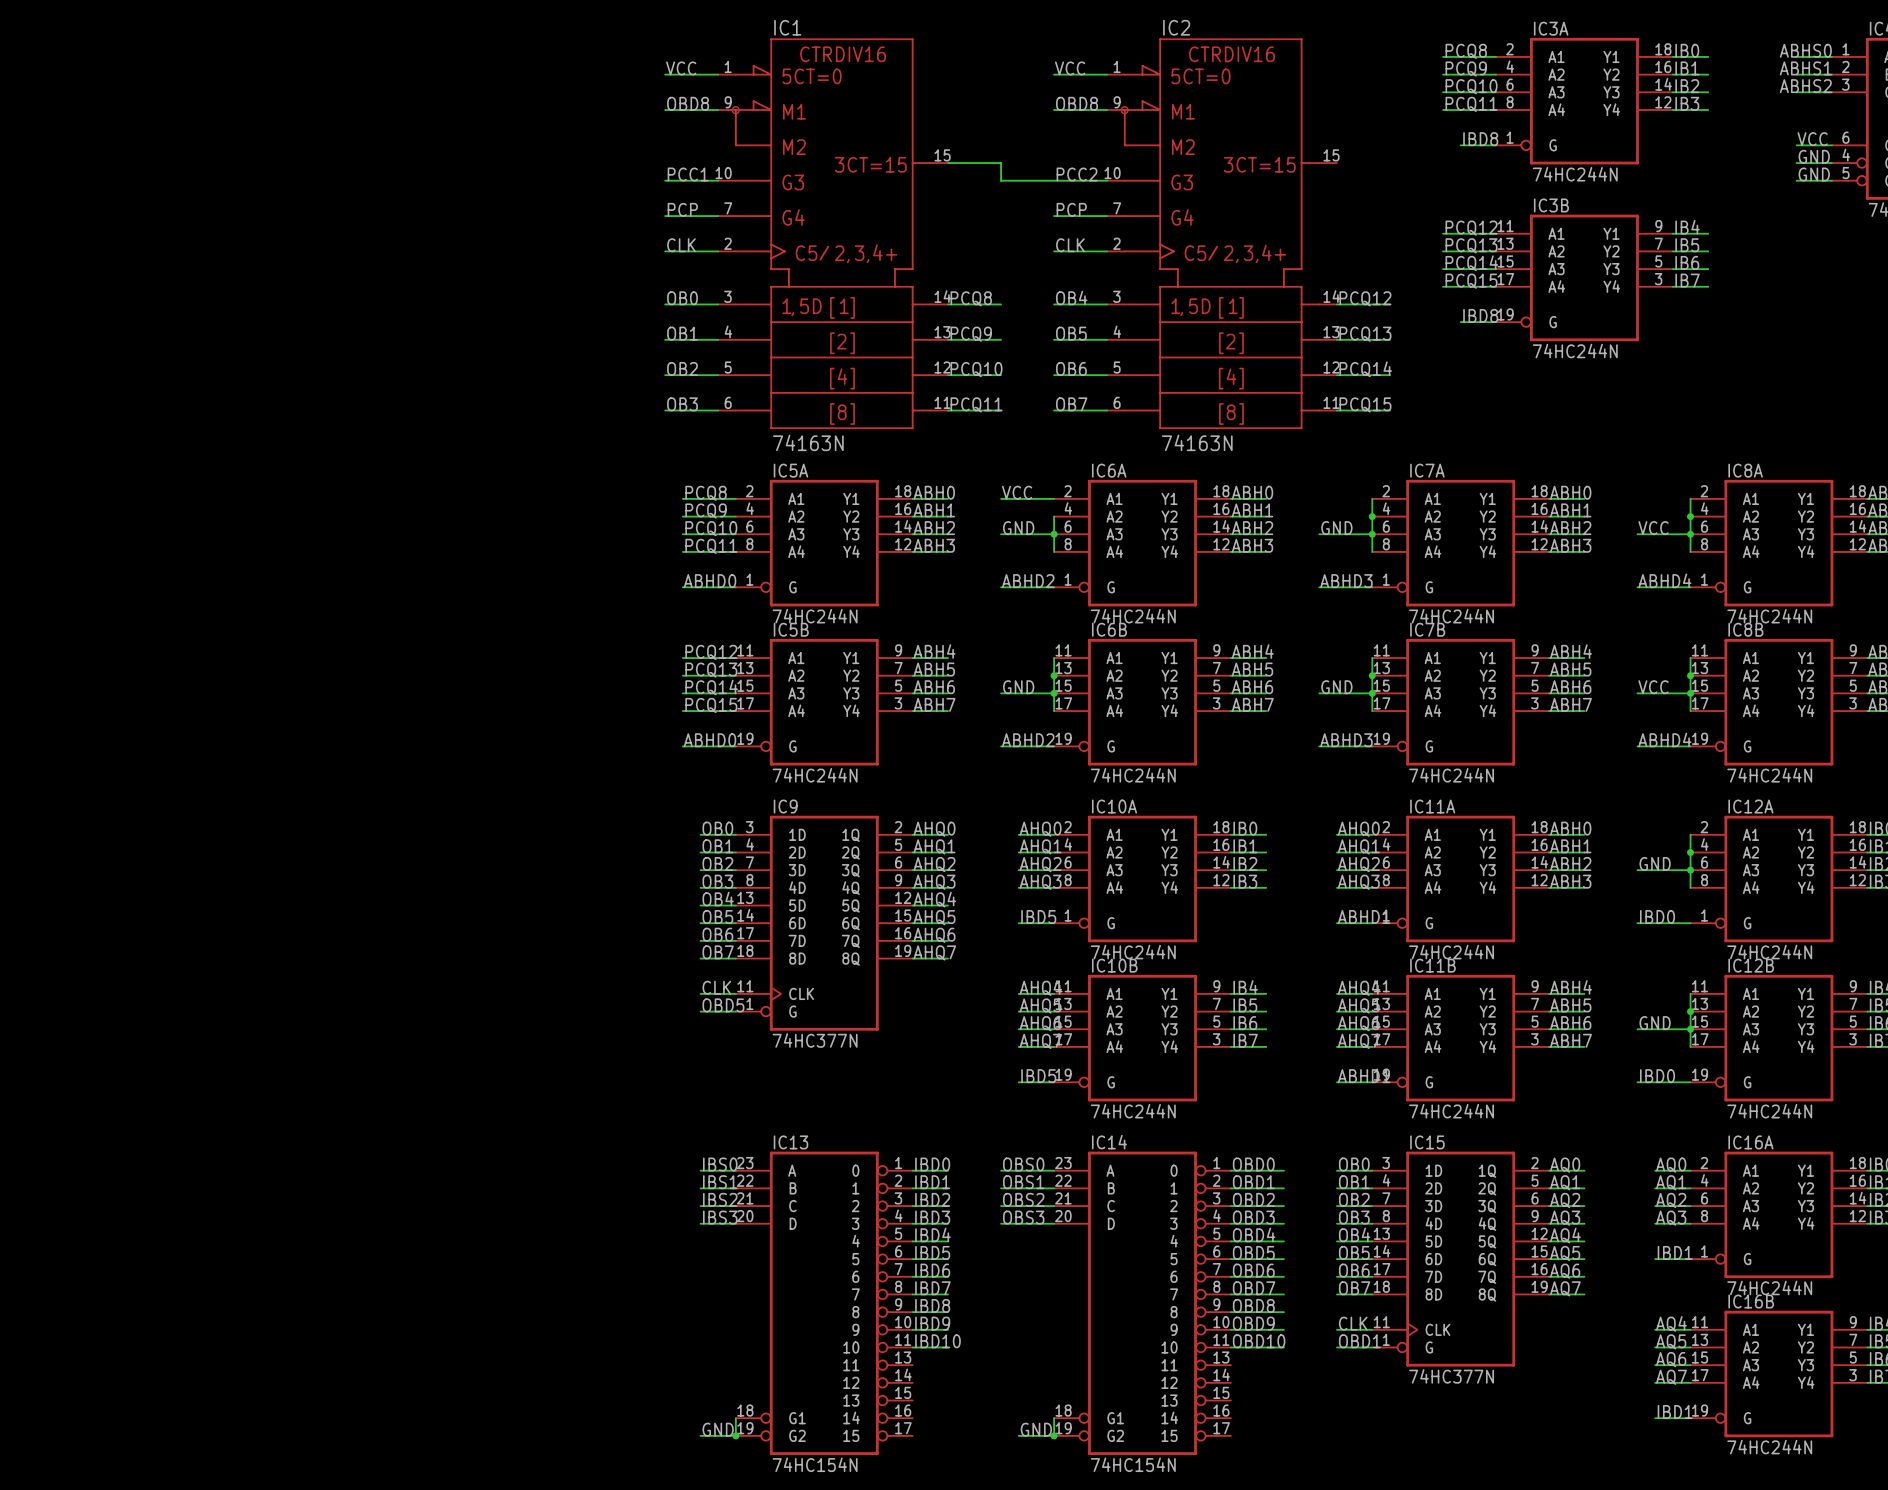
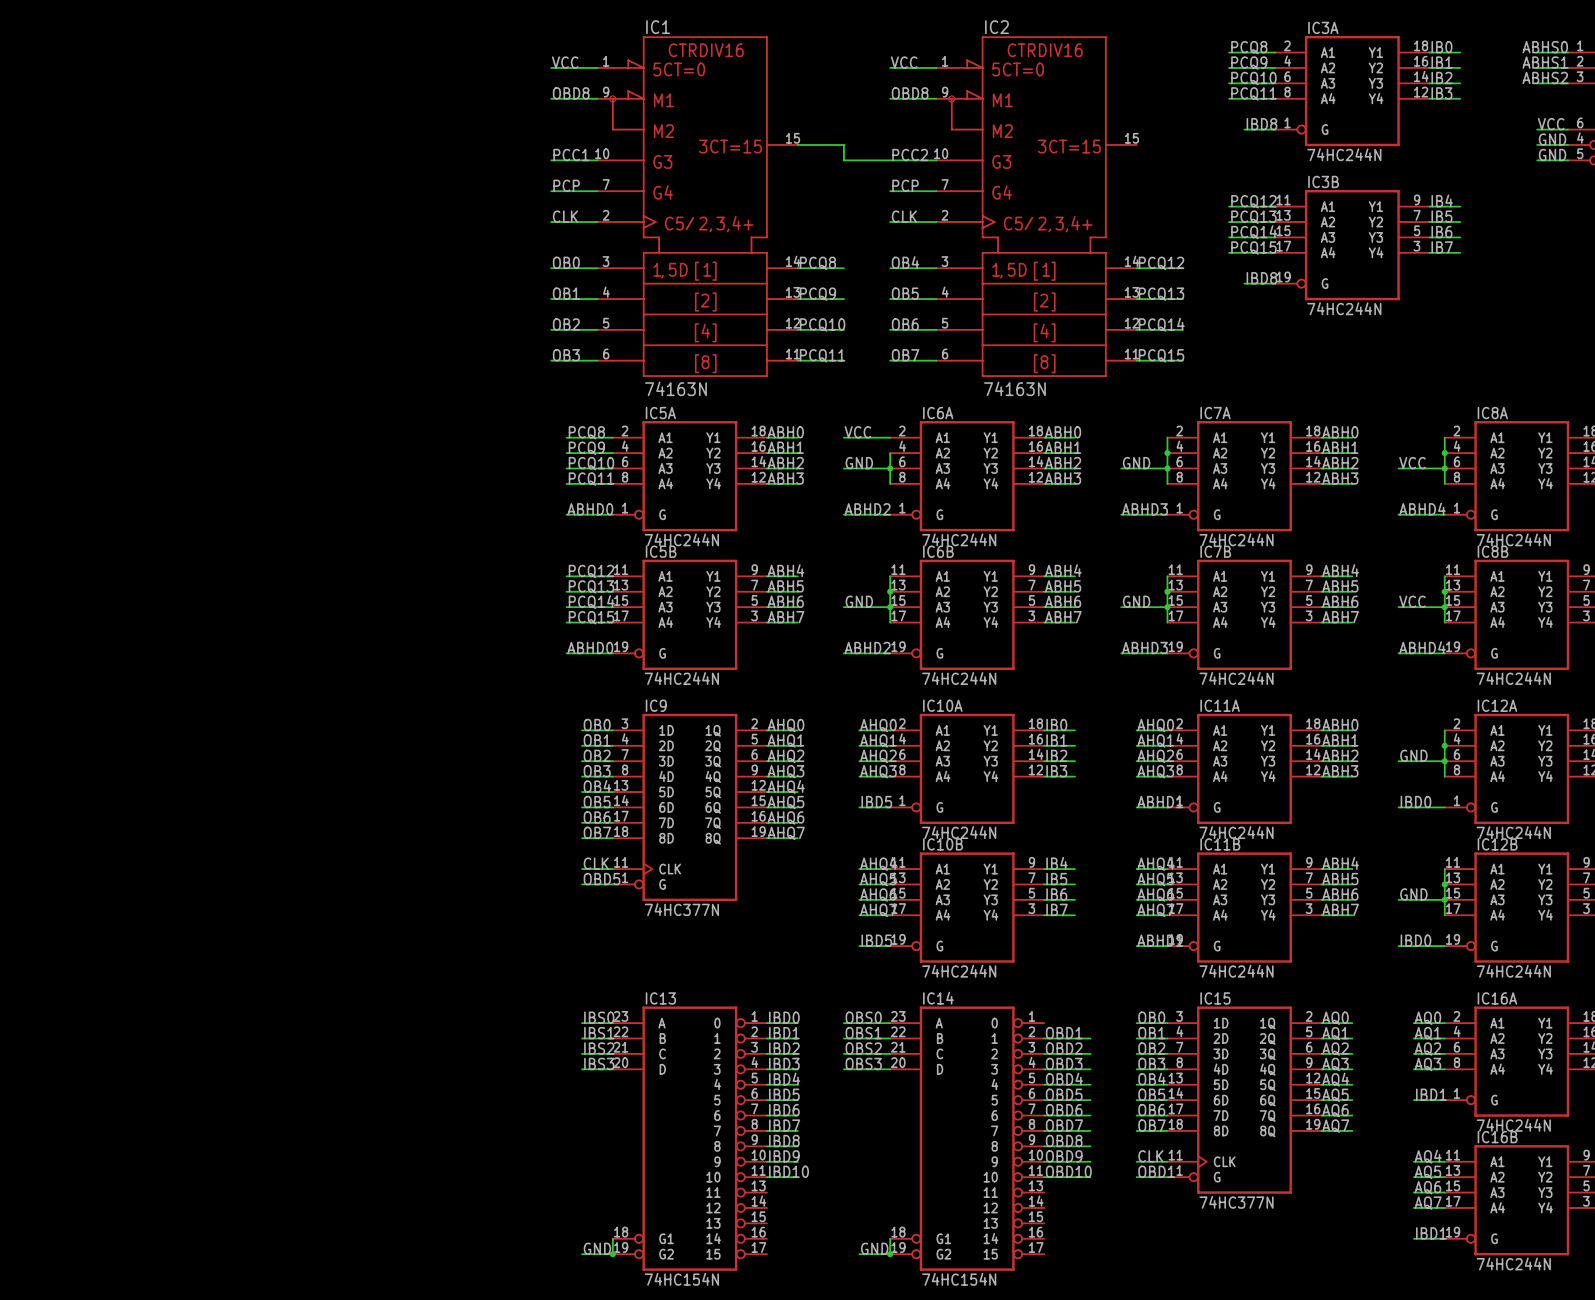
label: OBD0 (1253, 1164) -> none
wire: (1230, 1170) (1283, 1170) -> none

